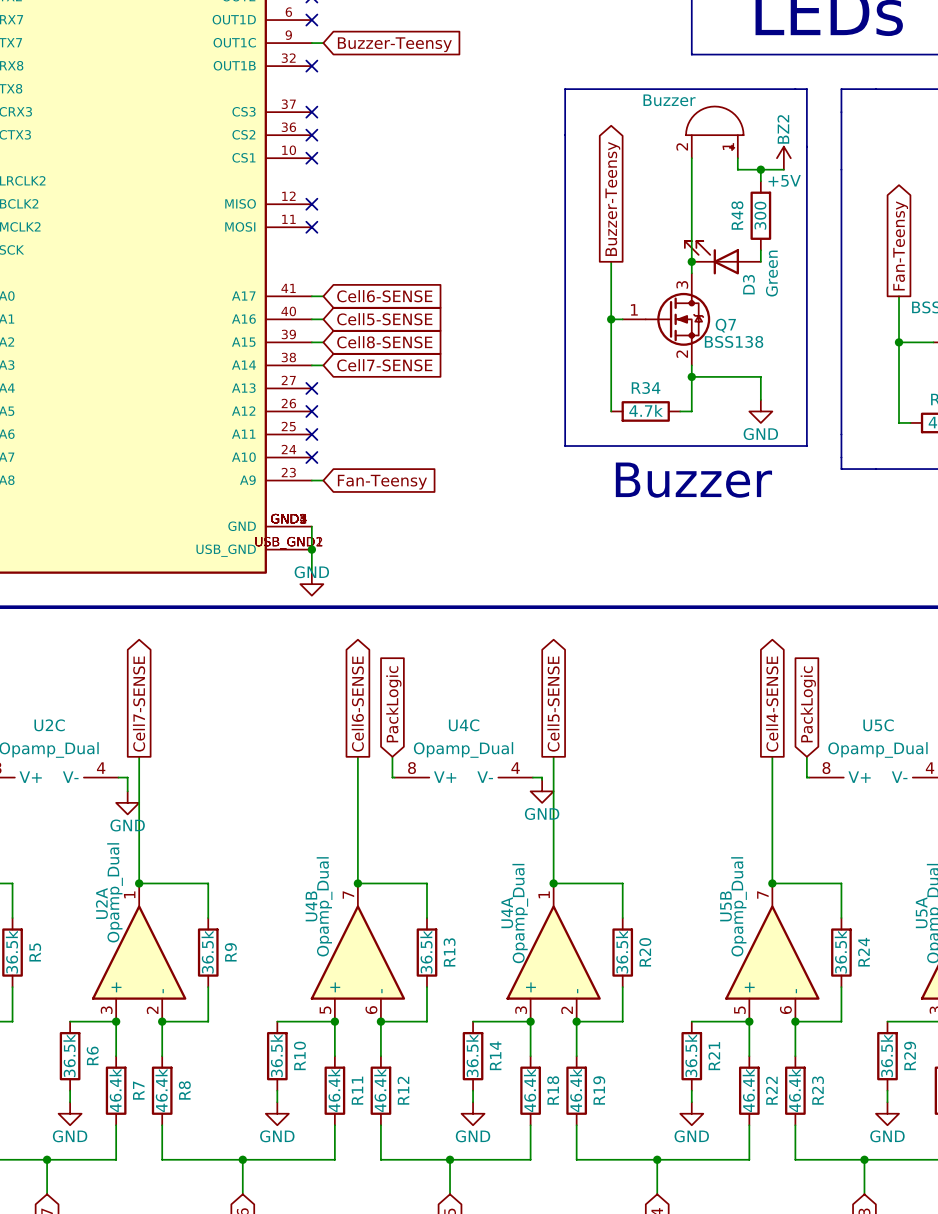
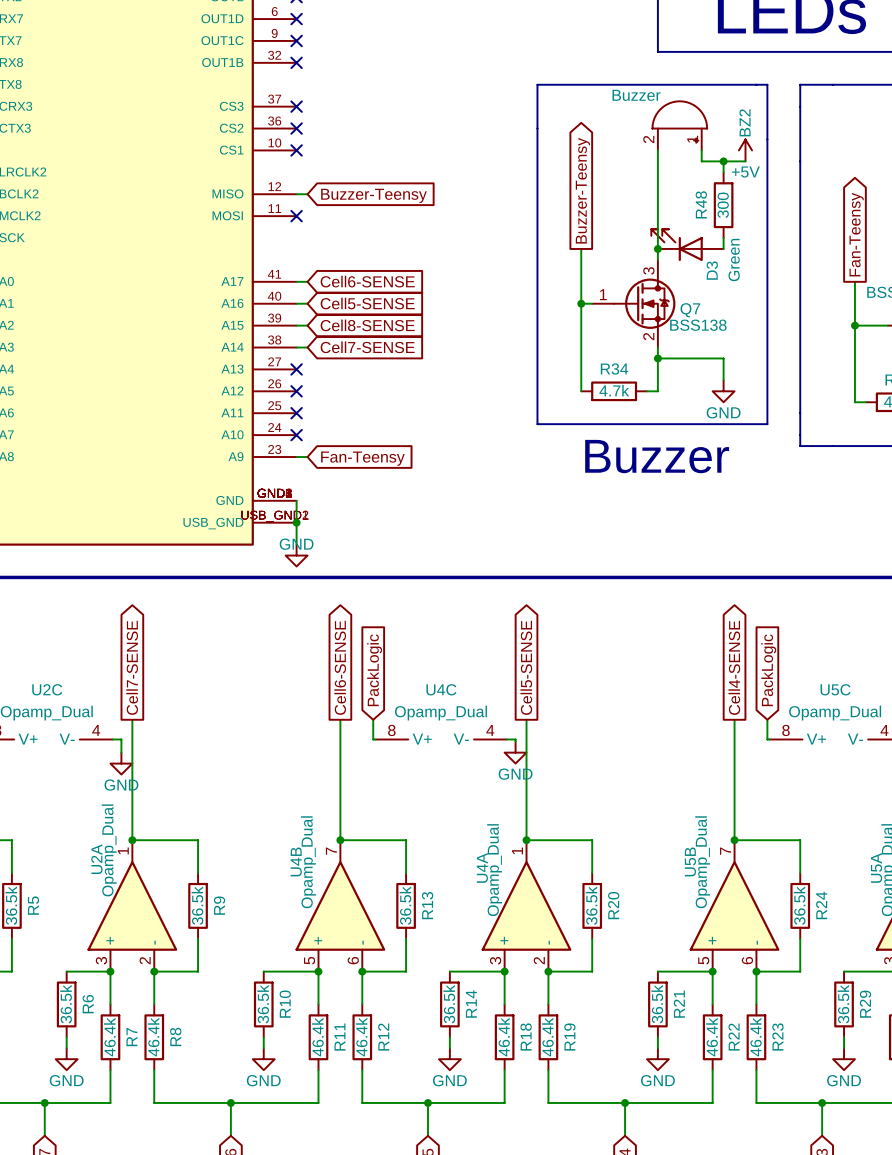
wire: (311, 43) (323, 43) -> (296, 194) (307, 194)
no-connect mark: none -> (296, 40)
global label position: Buzzer-Teensy (394, 44) -> Buzzer-Teensy (374, 195)
no-connect mark: (311, 204) -> none

